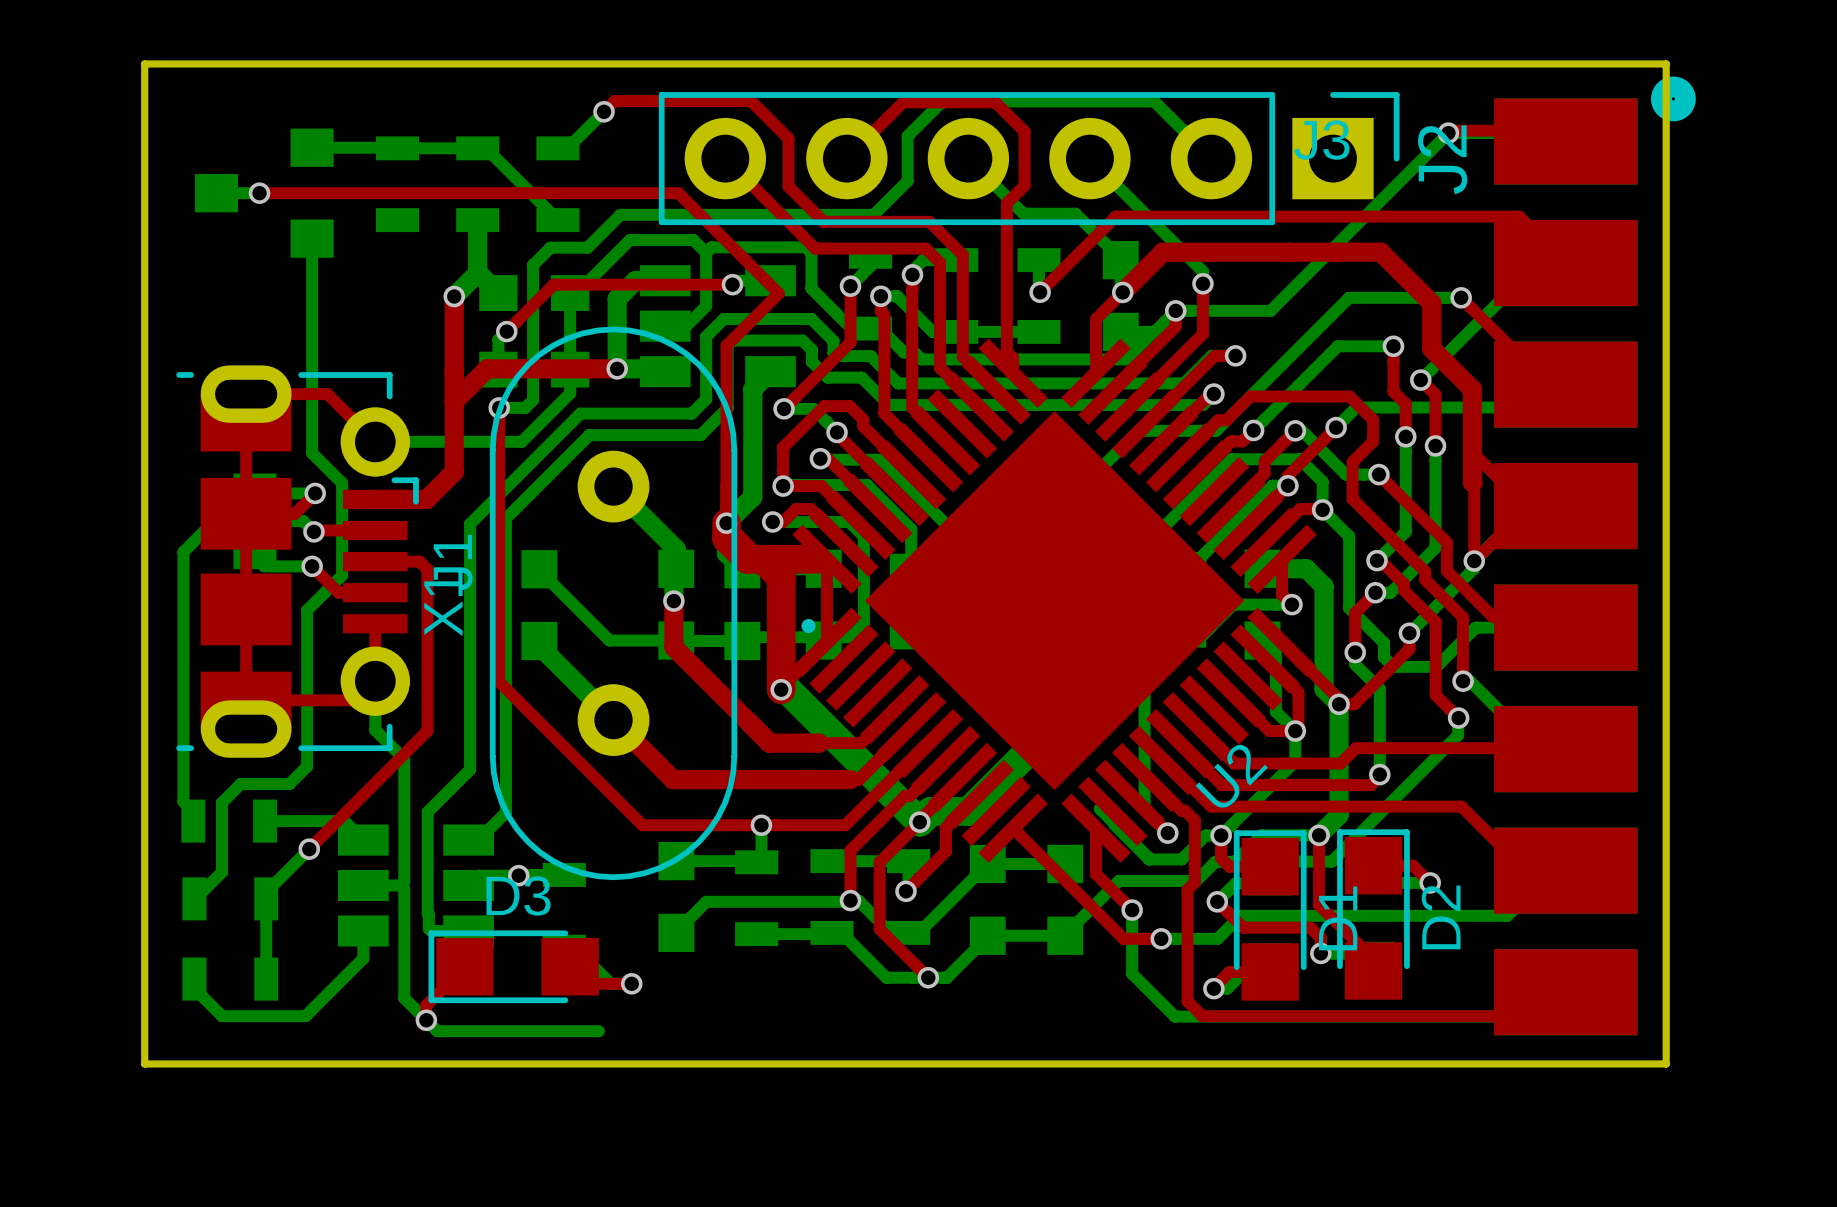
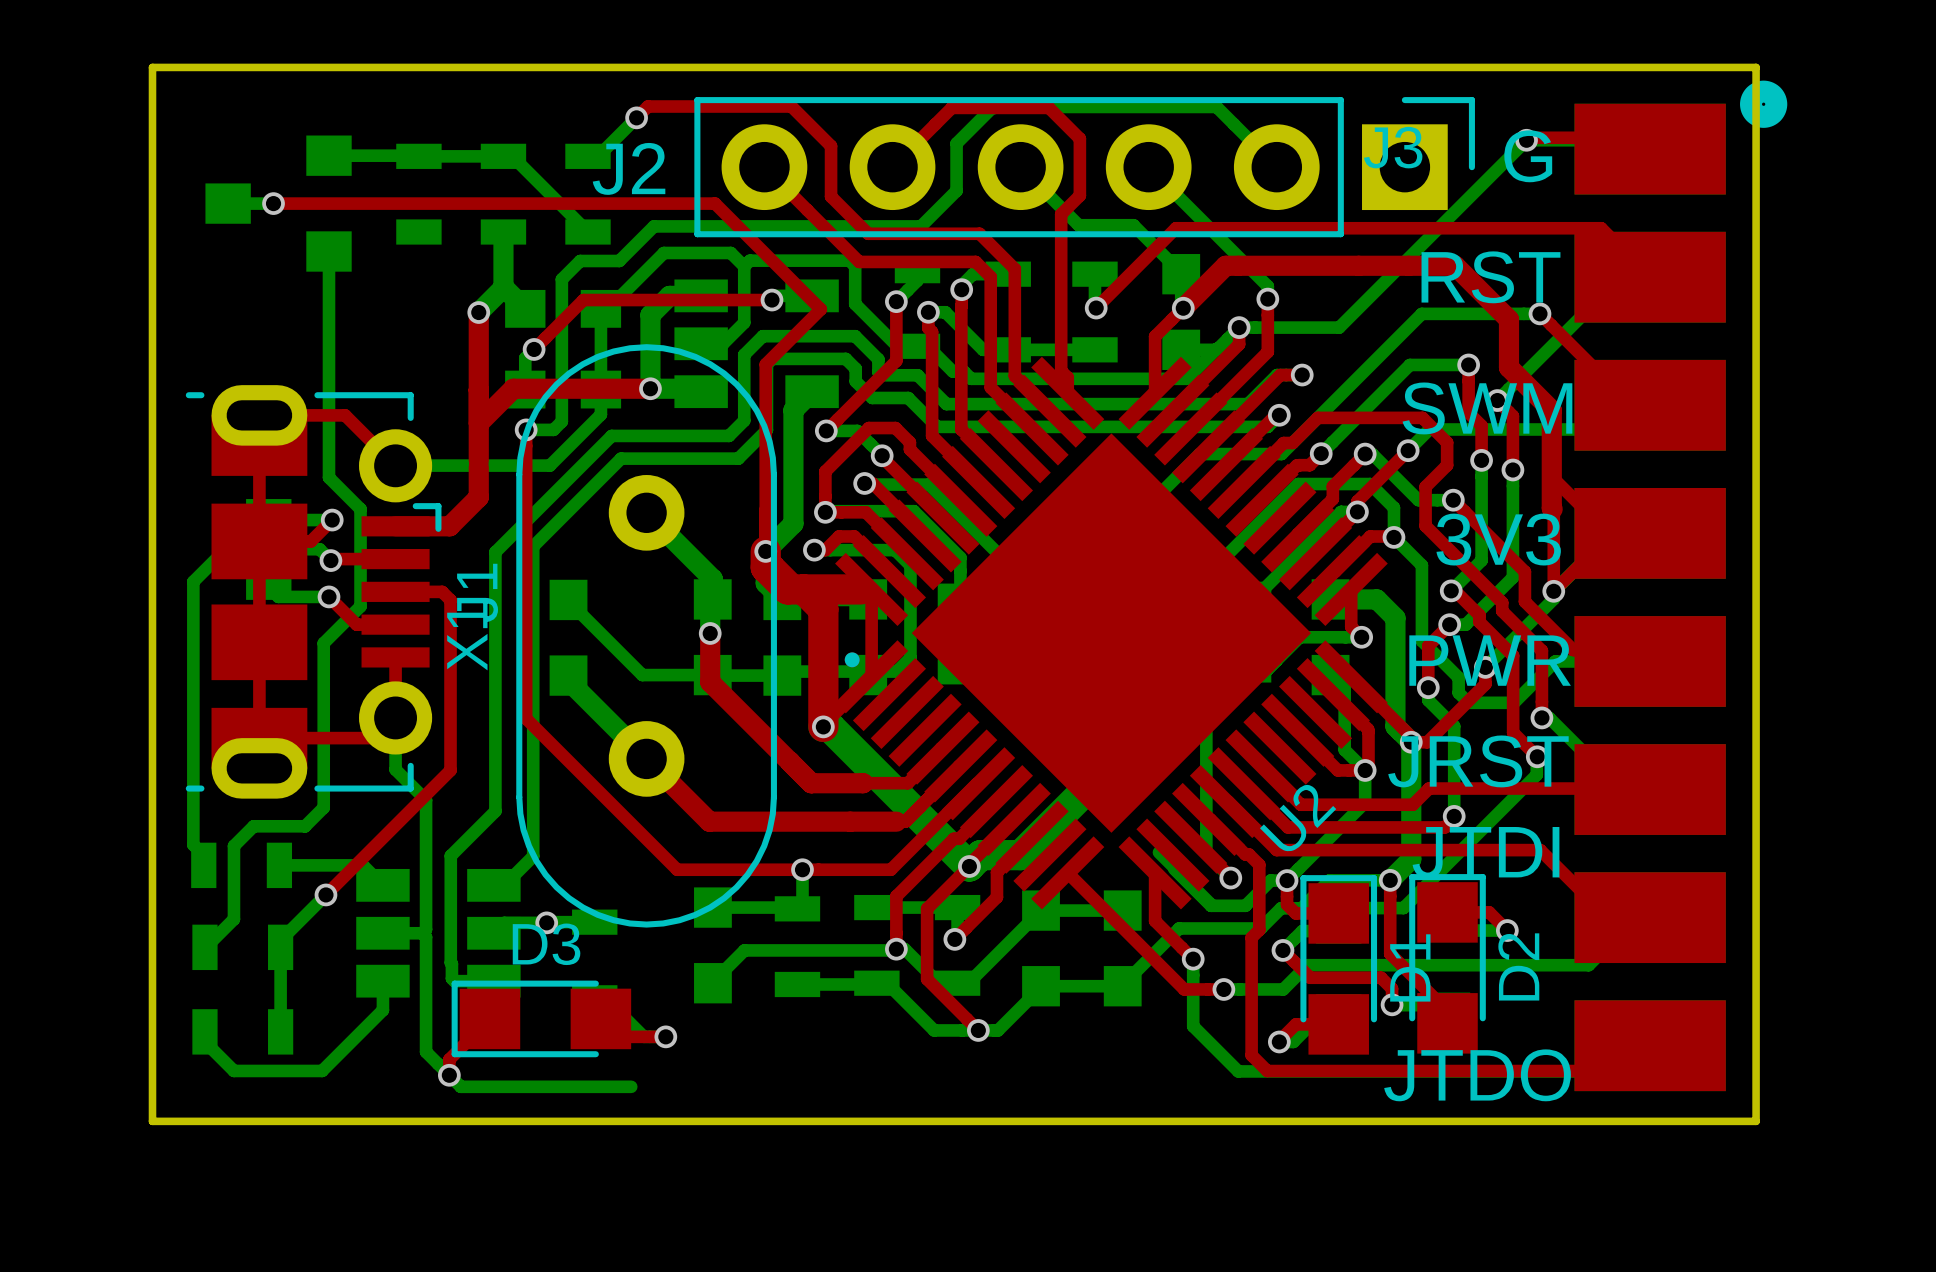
text: none -> G (1528, 156)
J2 name rotation: 0° (1442, 159) -> 90° clockwise (629, 168)
J2 name position: J2 (1442, 159) -> J2 (629, 168)
text: none -> RST (1490, 277)
text: none -> SWM (1487, 408)
text: none -> 3V3 (1498, 539)
text: none -> PWR (1490, 660)
text: none -> JRST (1478, 761)
text: none -> JTDI (1486, 852)
text: none -> JTDO (1477, 1075)

